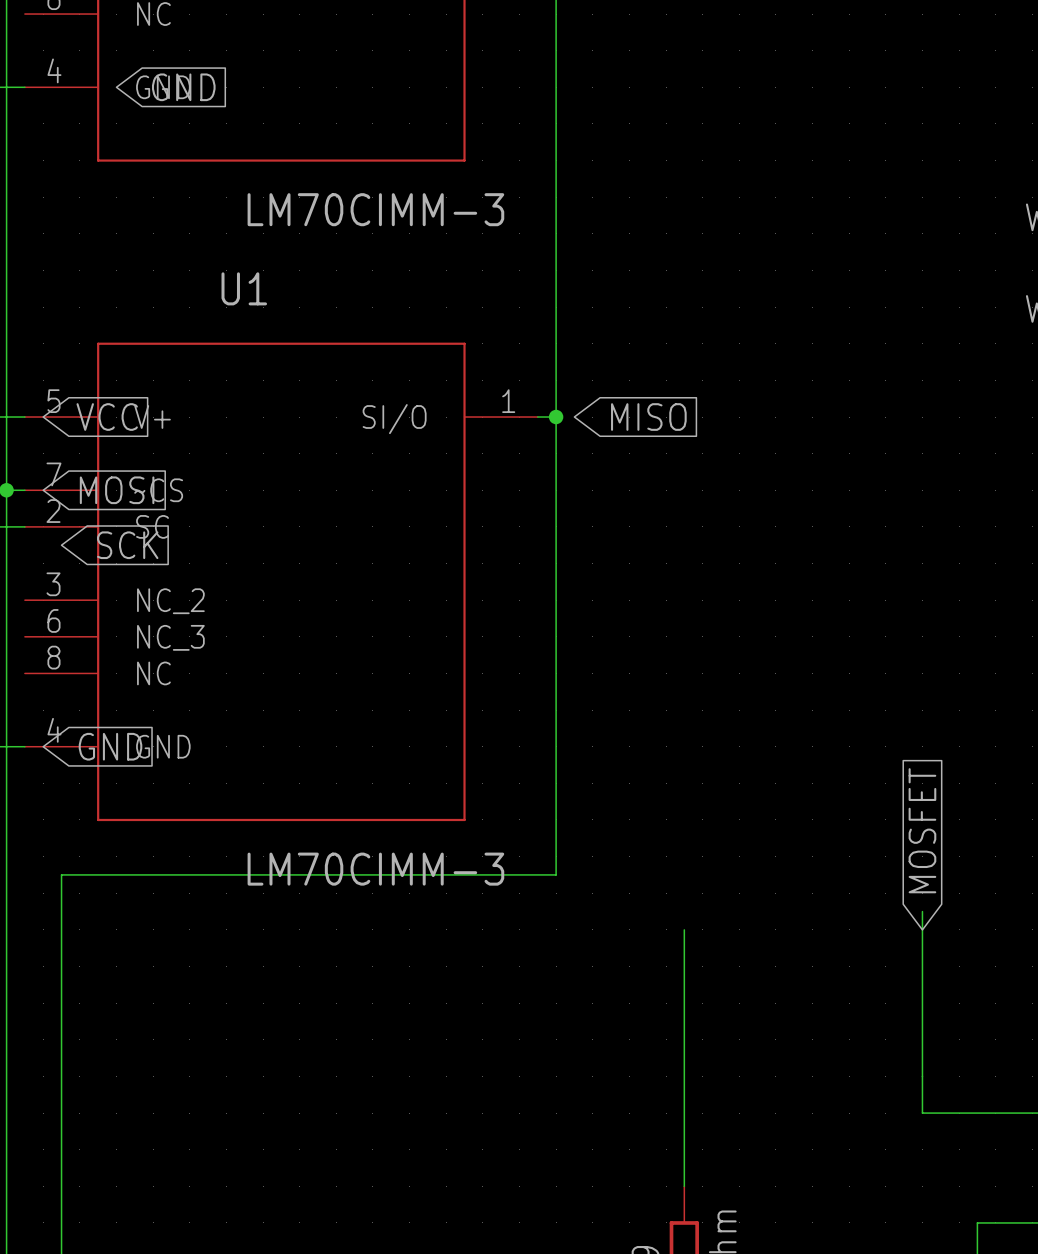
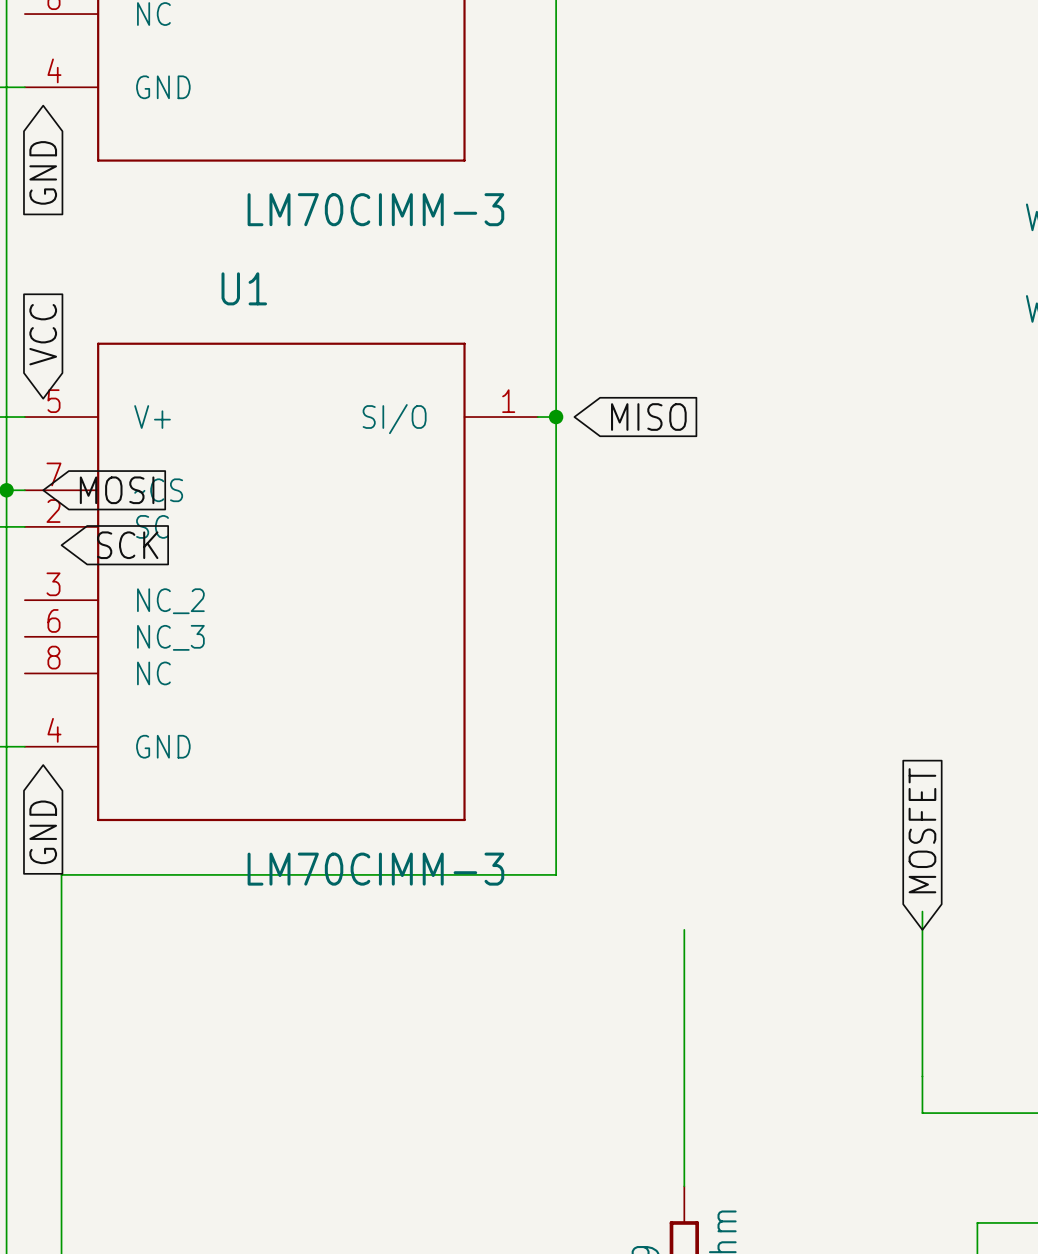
global label rotation: 0° (183, 87) -> 90° clockwise (43, 172)
global label position: GND (183, 87) -> GND (43, 172)
global label rotation: 0° (107, 417) -> 90° counterclockwise (43, 334)
global label rotation: 0° (110, 746) -> 90° clockwise (43, 832)

